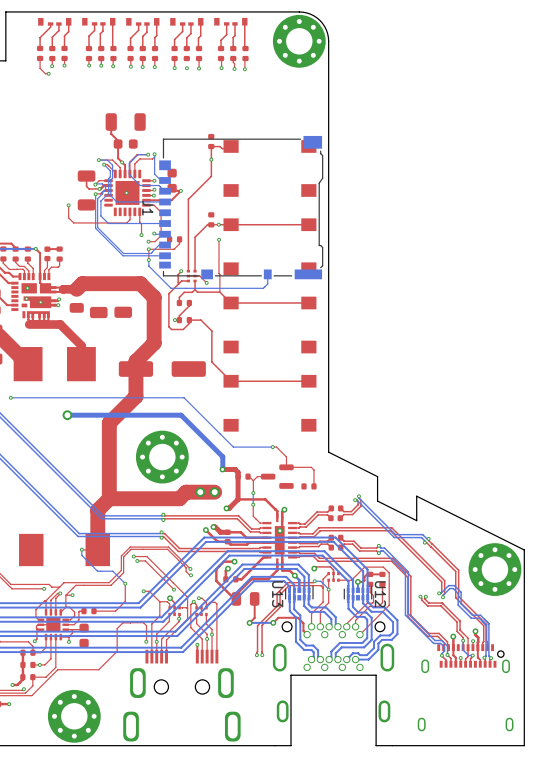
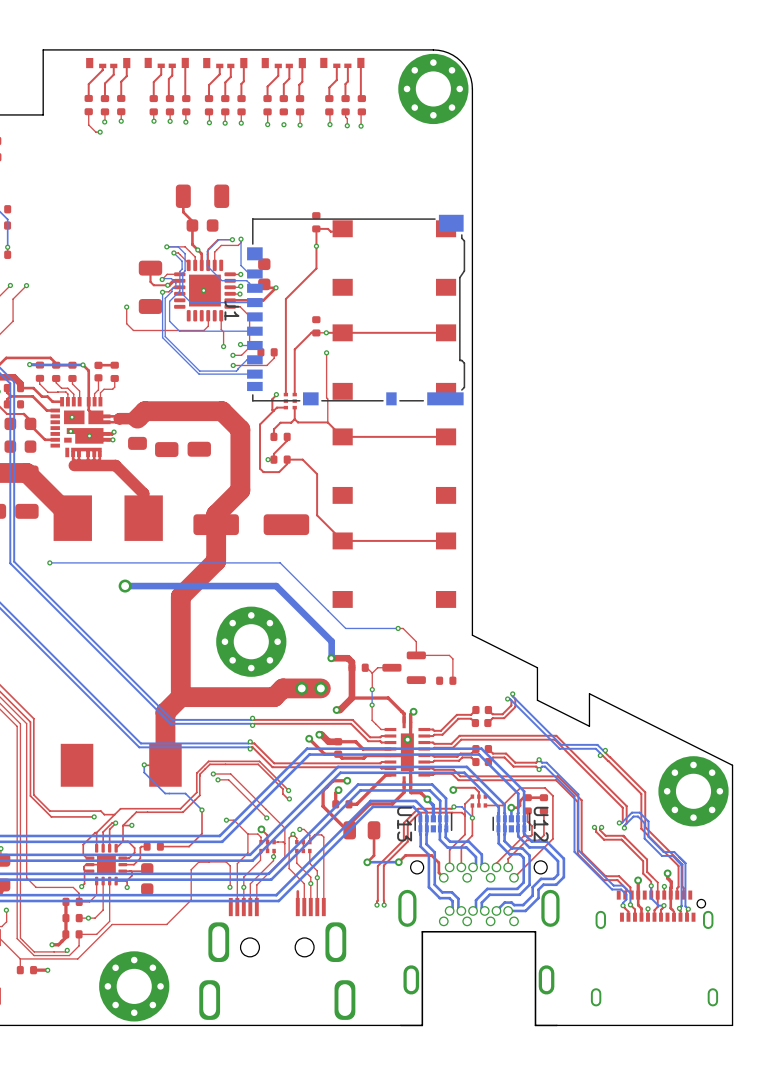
top track: (148, 249) (148, 260) -> none
bottom track: (148, 260) (148, 266) (171, 288) (263, 288) (267, 283) (267, 274) -> none
via: (148, 260) -> none
top track: (188, 276) (199, 276) (206, 282) -> none
via: (206, 282) -> none
via: (197, 644) -> none

